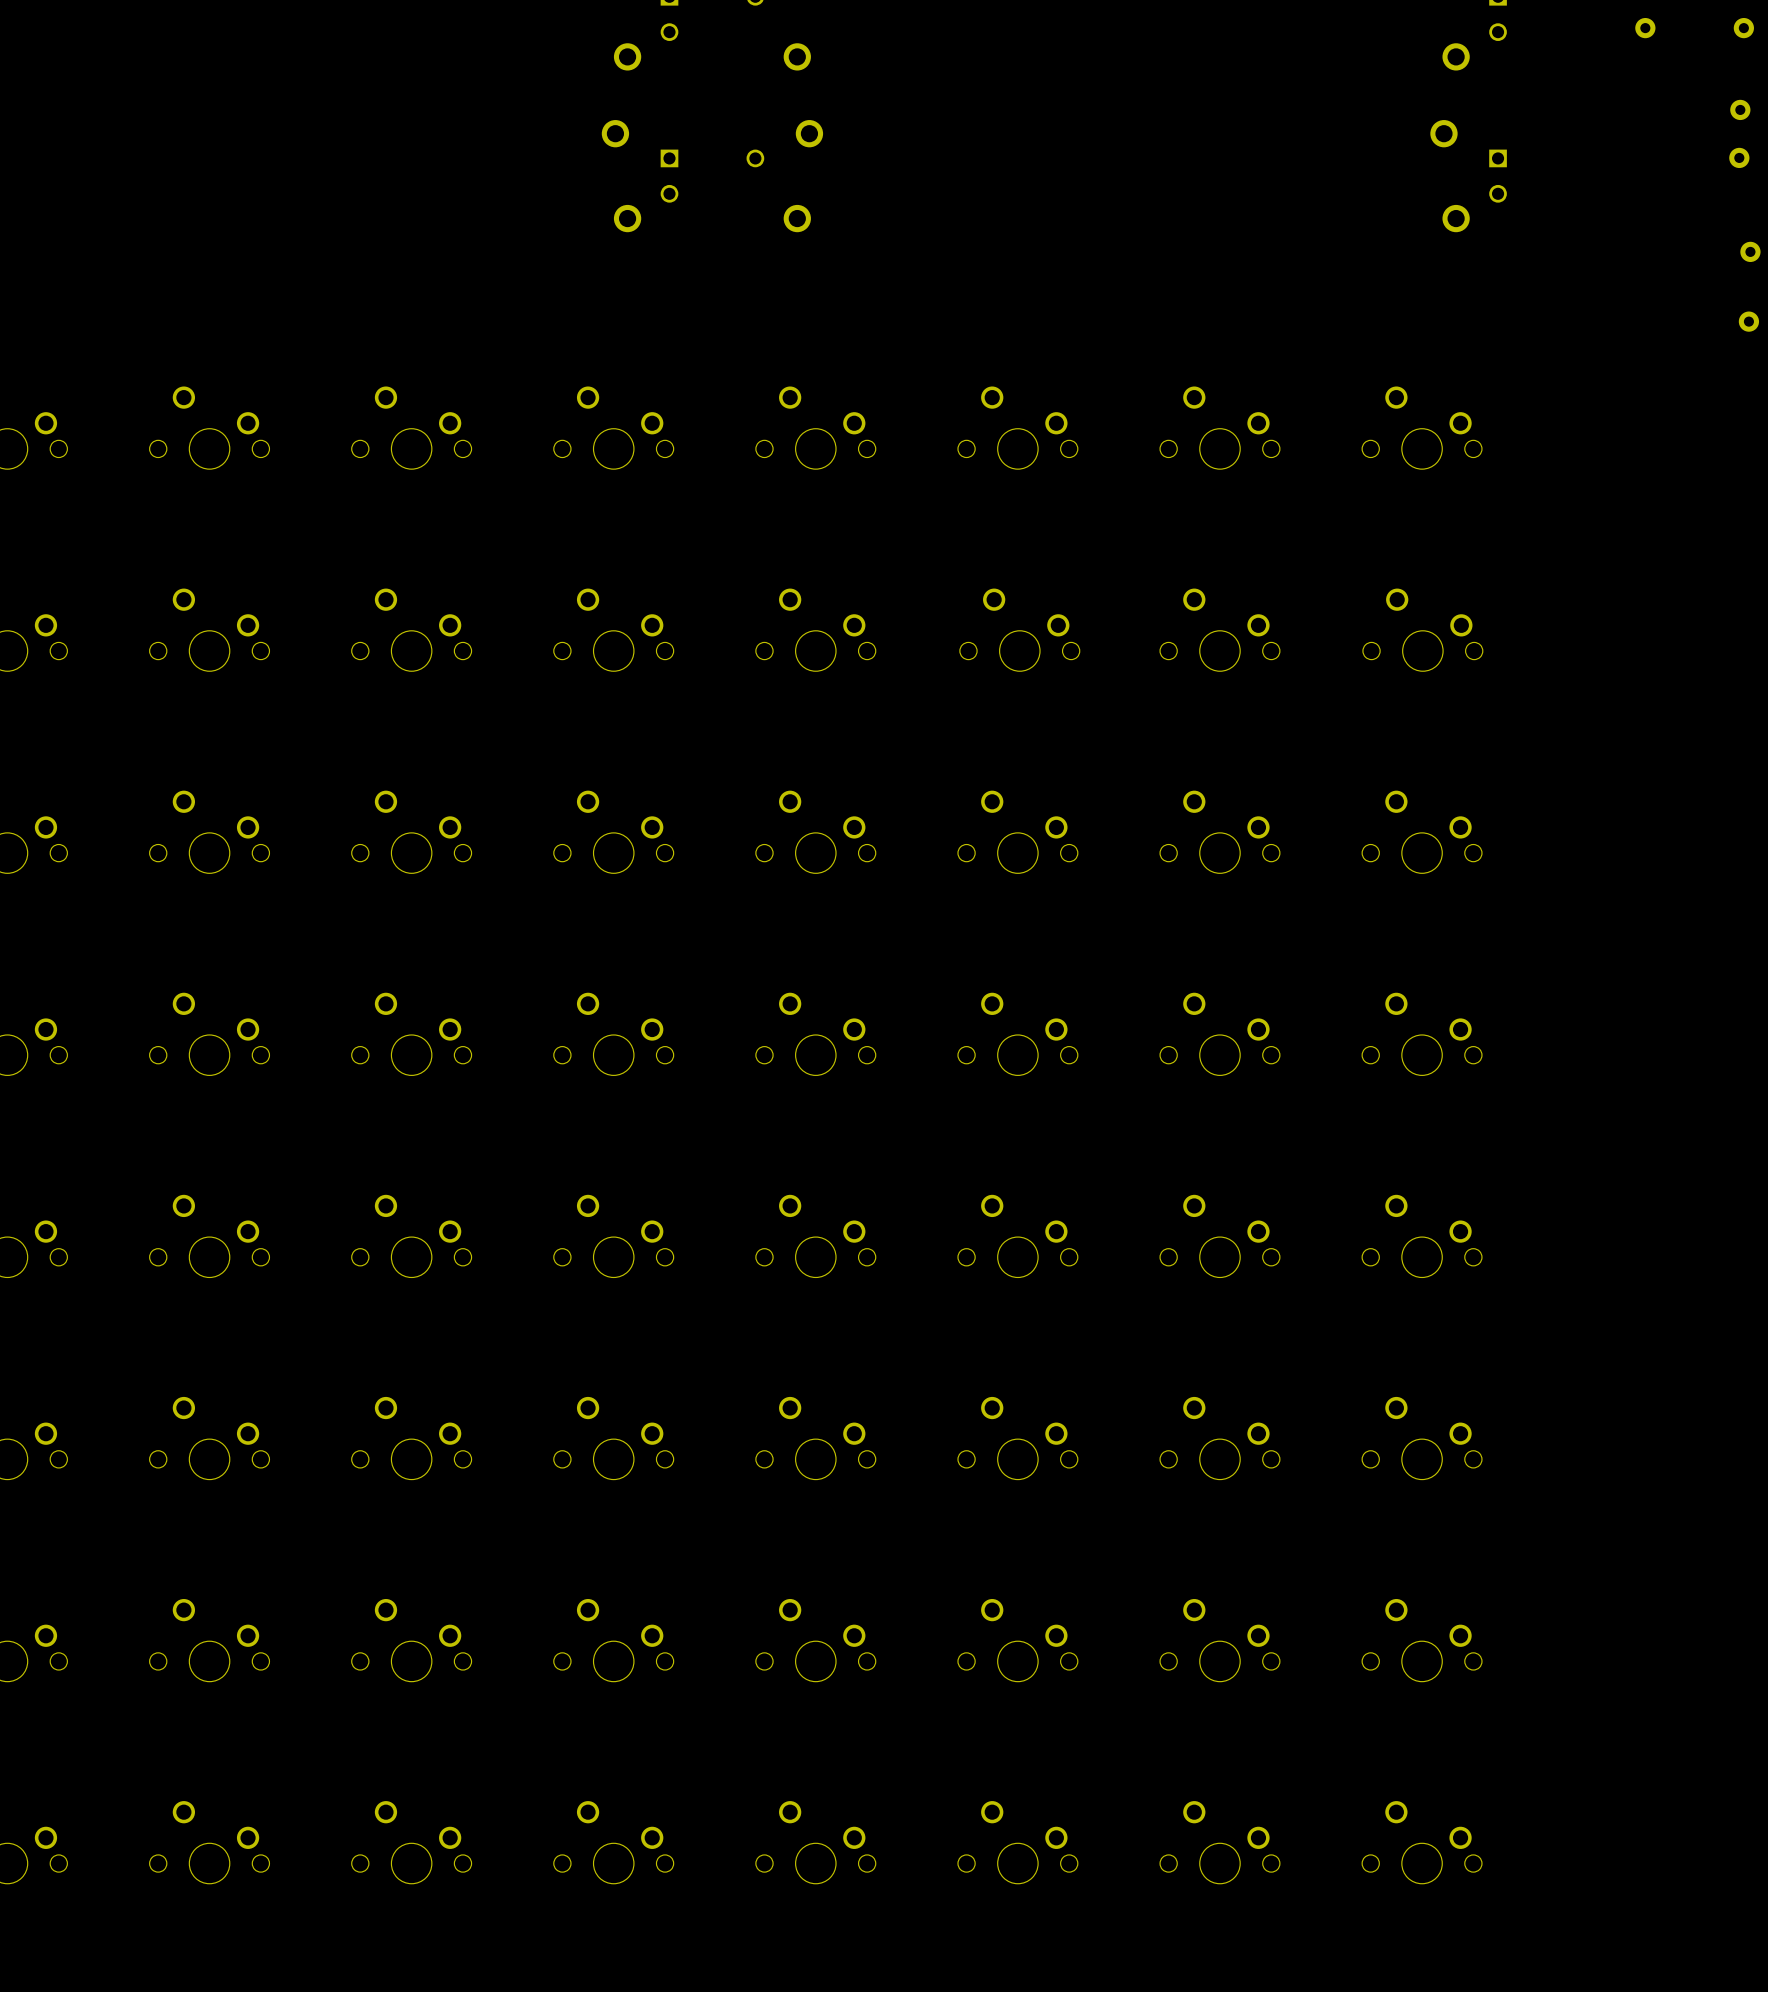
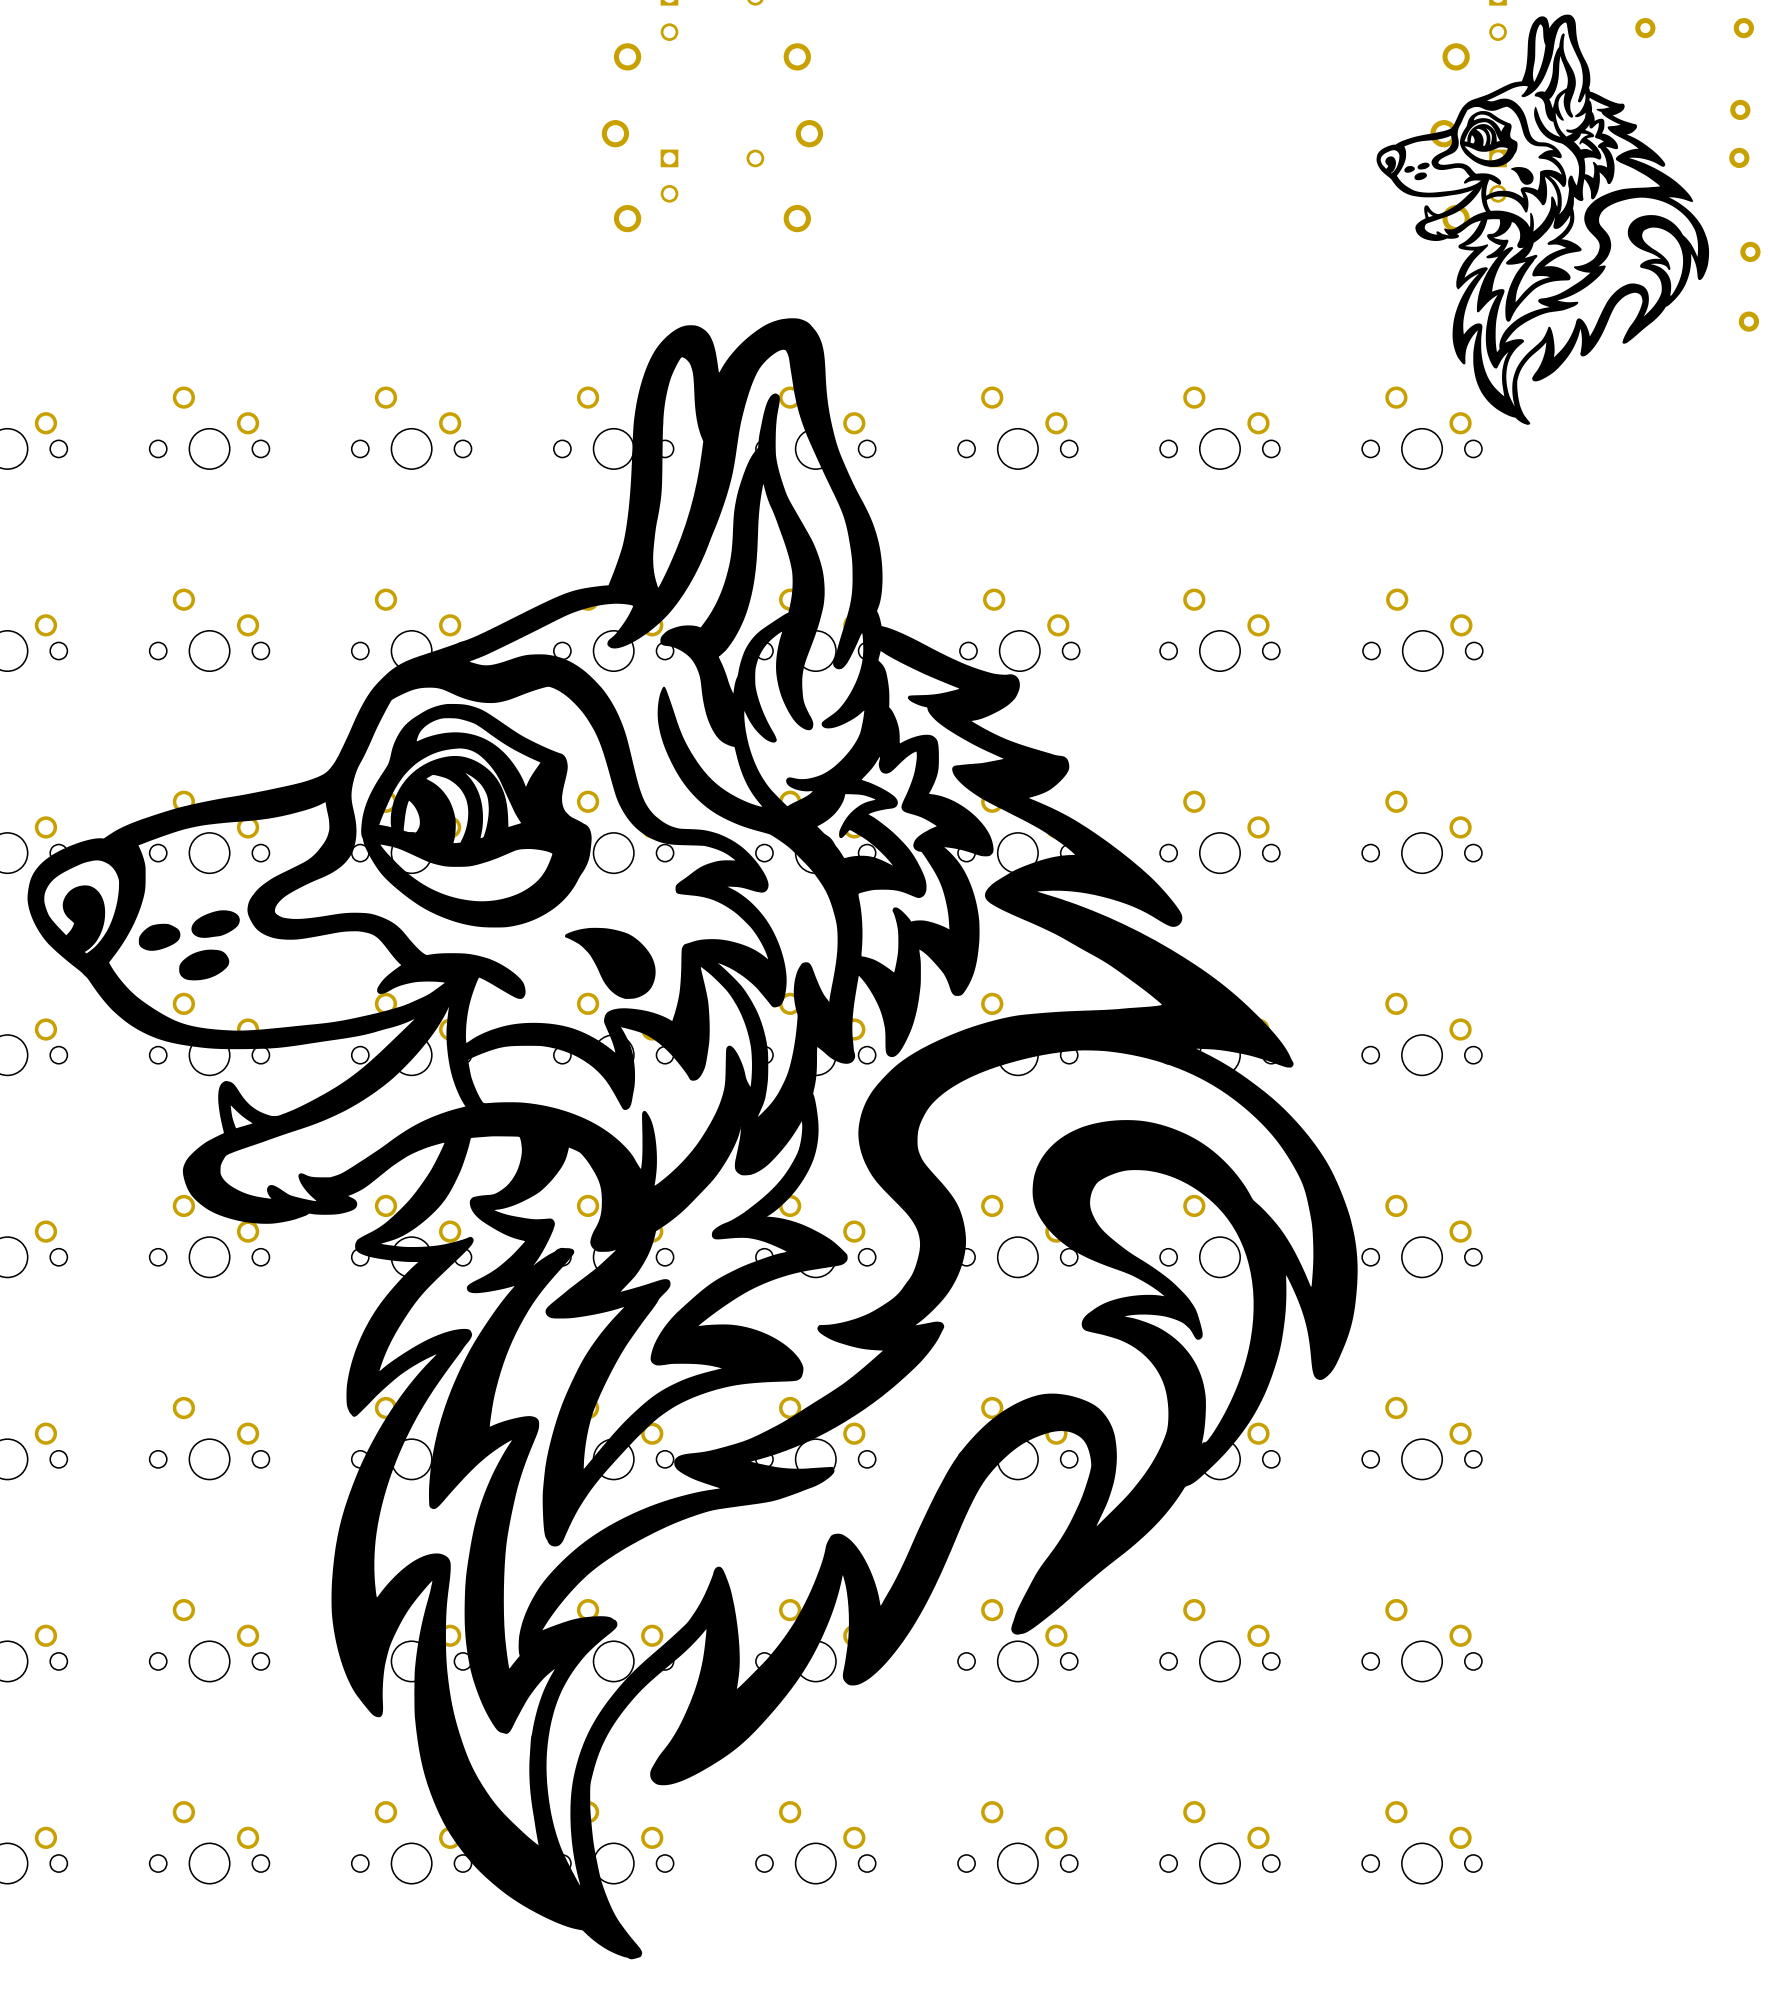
drawing: none -> [1376, 14, 1710, 425]
drawing: none -> [27, 318, 1358, 1960]

